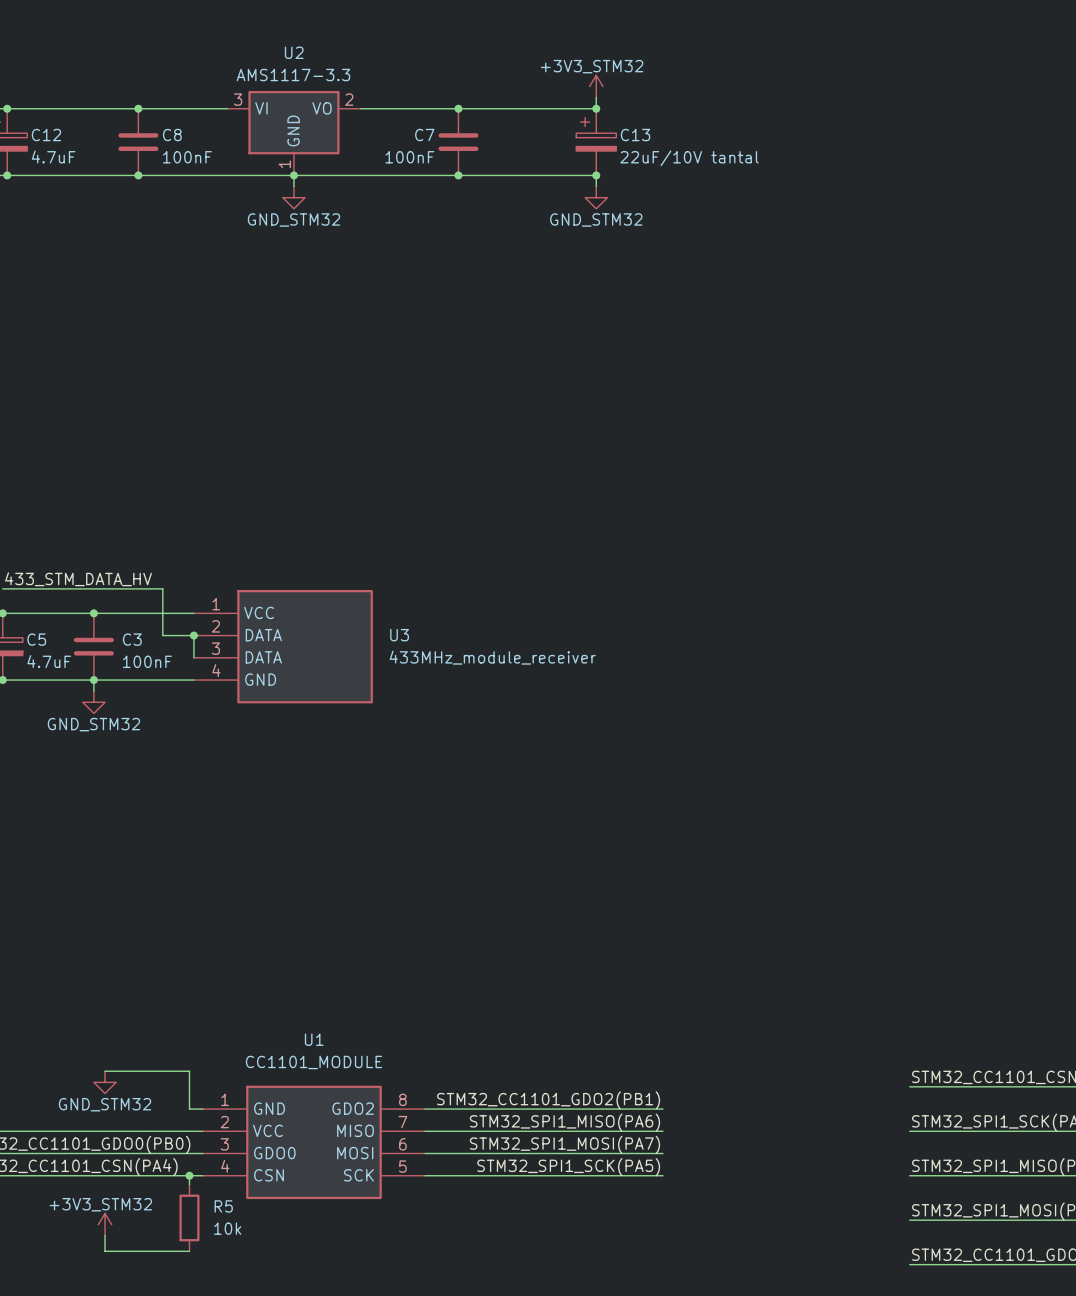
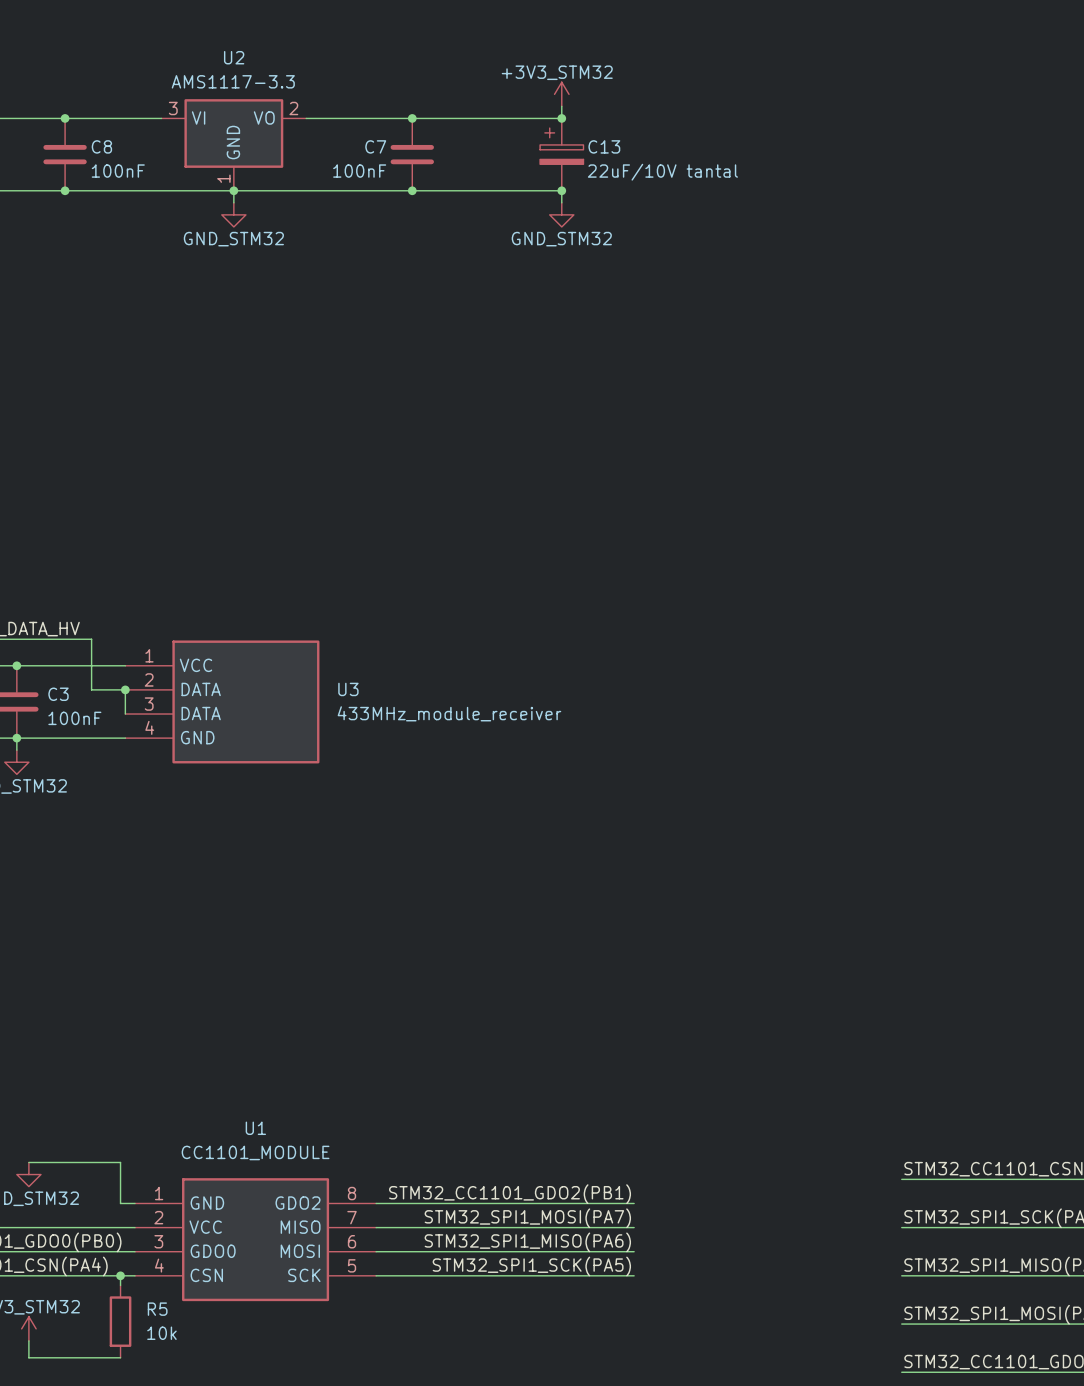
label: STM32_SPI1_MISO(PA6) (564, 1122) -> STM32_SPI1_MOSI(PA7) (527, 1218)
label: STM32_SPI1_MOSI(PA7) (564, 1144) -> STM32_SPI1_MISO(PA6) (527, 1242)

